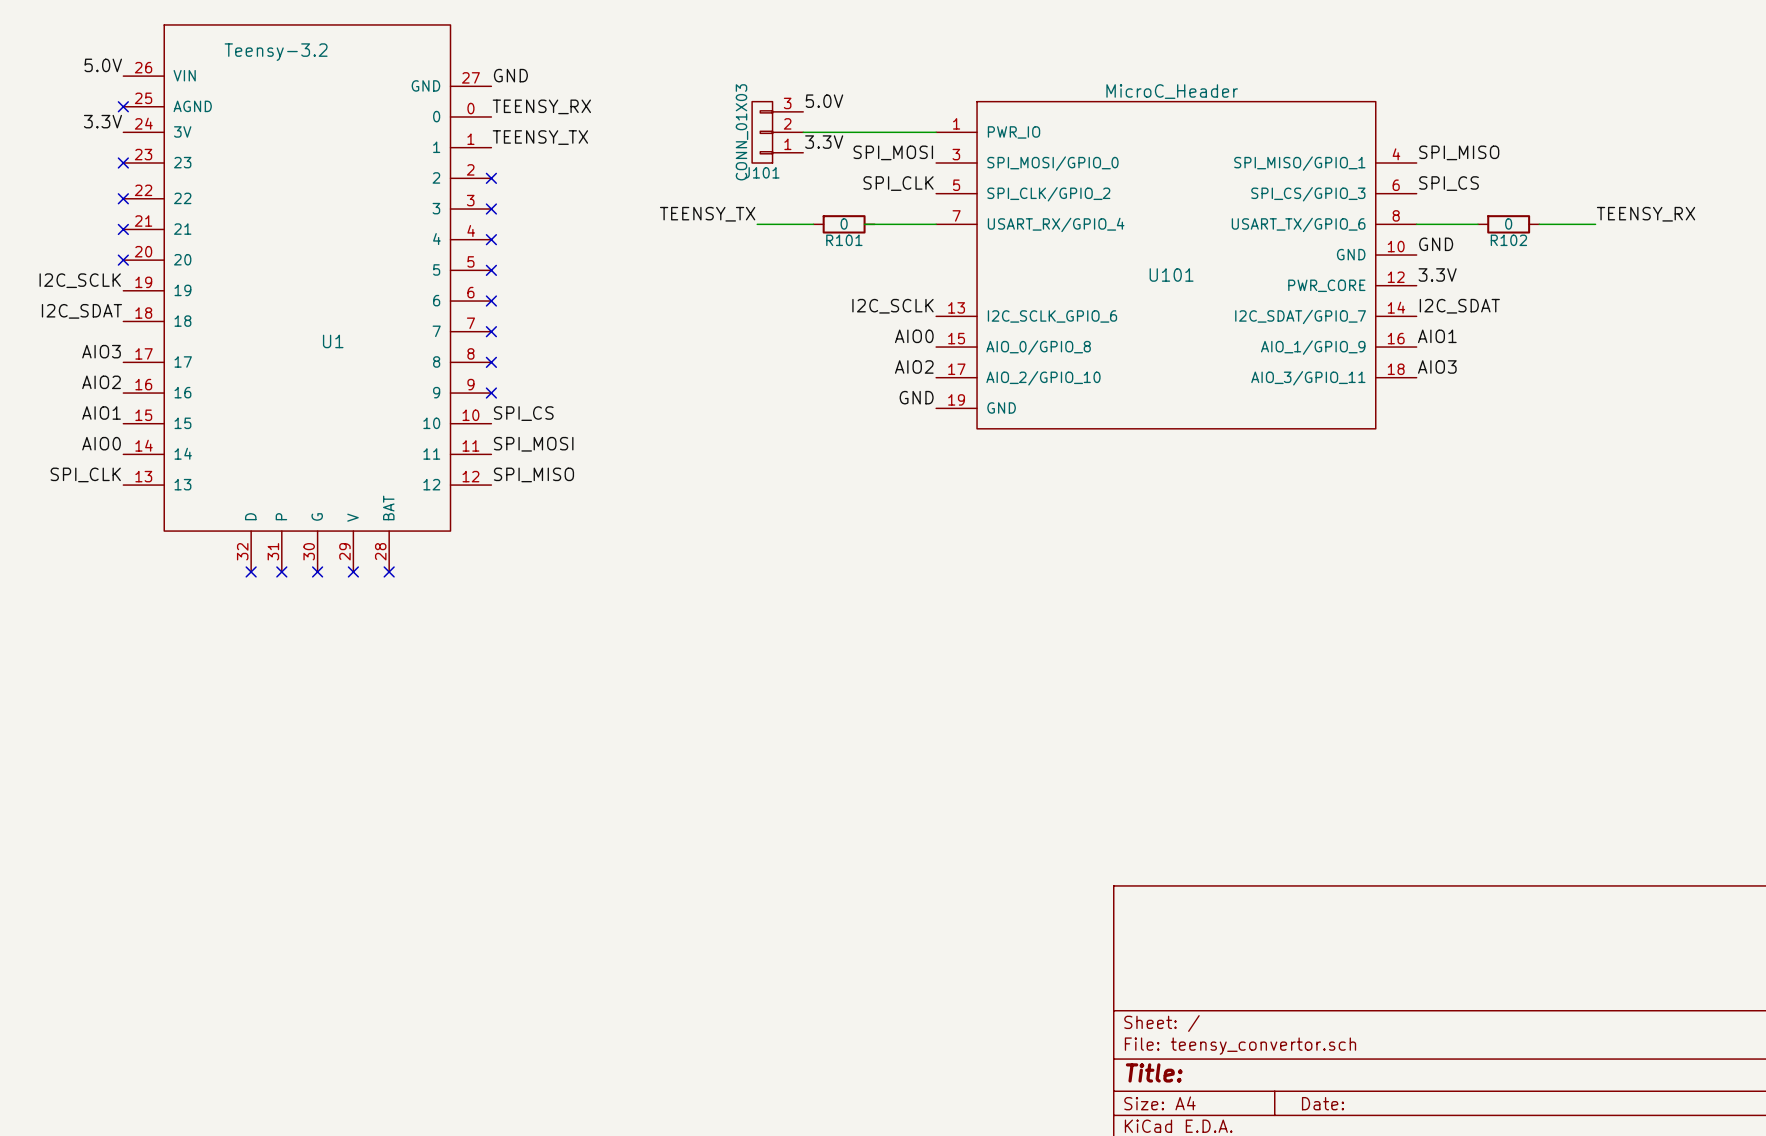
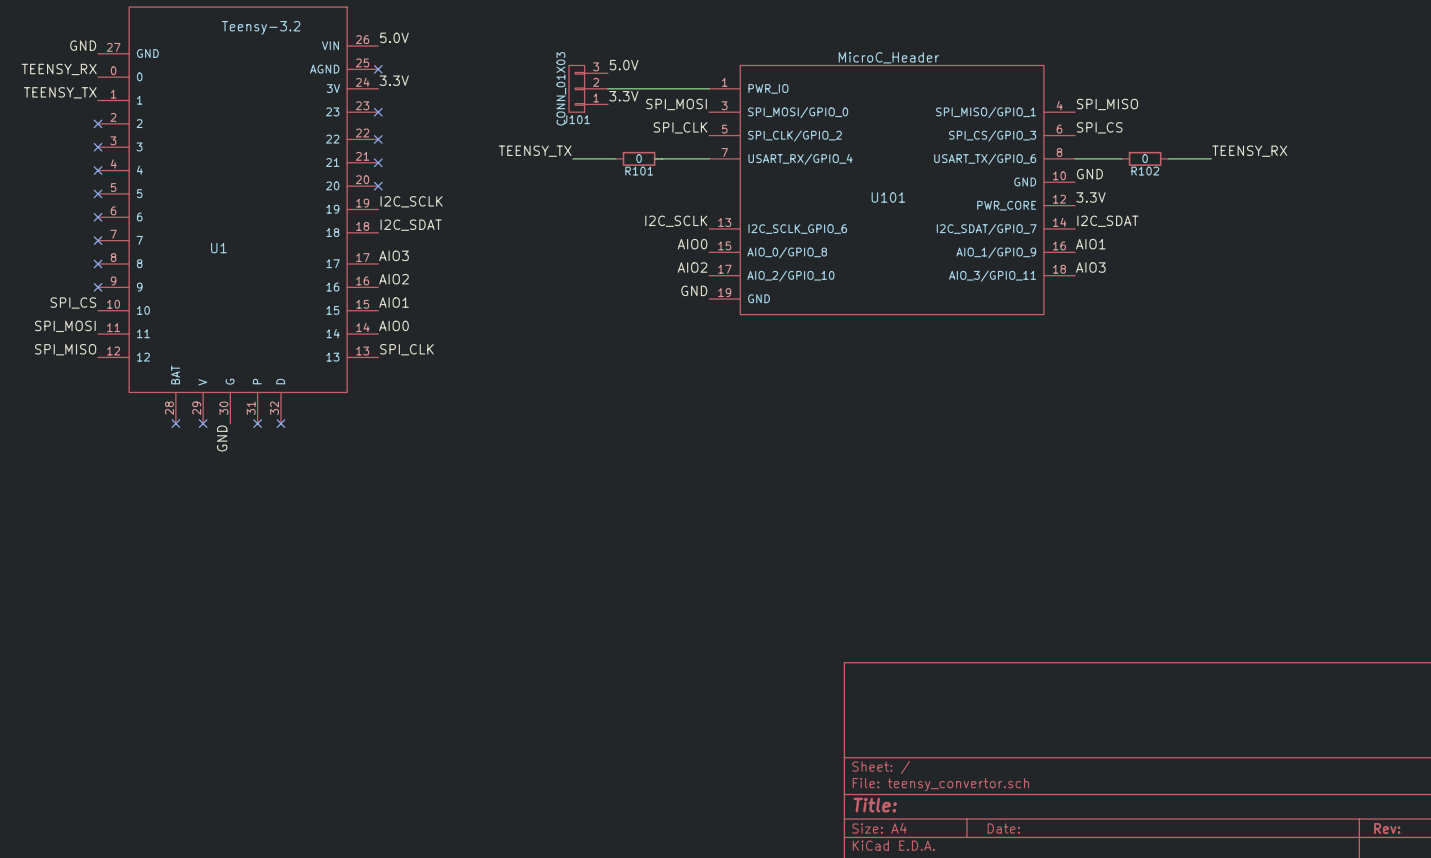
label: 5.0V (103, 65) -> none
label: none -> 5.0V (394, 37)
label: none -> GND (83, 45)
label: GND (510, 75) -> none
label: none -> TEENSY_RX (59, 69)
no-connect mark: (123, 106) -> none
no-connect mark: none -> (378, 69)
label: TEENSY_RX (541, 106) -> none
label: 3.3V (102, 121) -> none
label: none -> 3.3V (394, 80)
label: none -> TEENSY_TX (60, 92)
label: TEENSY_TX (540, 137) -> none
no-connect mark: (123, 163) -> none
no-connect mark: none -> (378, 112)
no-connect mark: none -> (98, 123)
no-connect mark: (491, 178) -> none
no-connect mark: (123, 198) -> none
no-connect mark: none -> (378, 139)
no-connect mark: none -> (98, 147)
no-connect mark: (491, 209) -> none
no-connect mark: (123, 229) -> none
no-connect mark: none -> (378, 162)
no-connect mark: none -> (98, 170)
no-connect mark: (491, 239) -> none
no-connect mark: (123, 260) -> none
no-connect mark: none -> (378, 186)
no-connect mark: none -> (98, 193)
no-connect mark: (491, 270) -> none
U1 flip: as is (307, 278) -> left-right (238, 199)
label: I2C_SCLK (80, 280) -> none
label: none -> I2C_SCLK (411, 201)
no-connect mark: none -> (98, 217)
no-connect mark: (491, 301) -> none
label: I2C_SDAT (81, 311) -> none
label: none -> I2C_SDAT (411, 225)
no-connect mark: none -> (98, 240)
no-connect mark: (491, 331) -> none
label: AIO3 (101, 351) -> none
label: none -> AIO3 (394, 255)
no-connect mark: none -> (98, 264)
no-connect mark: (491, 362) -> none
label: AIO2 (101, 382) -> none
label: none -> AIO2 (394, 279)
no-connect mark: none -> (98, 287)
no-connect mark: (491, 393) -> none
label: AIO1 (101, 413) -> none
label: none -> SPI_CS (73, 303)
label: none -> AIO1 (394, 302)
label: SPI_CS (523, 413) -> none
label: AIO0 (101, 443) -> none
label: none -> AIO0 (394, 325)
label: none -> SPI_MOSI (65, 326)
label: SPI_MOSI (533, 444) -> none
label: SPI_CLK (85, 474) -> none
label: none -> SPI_MISO (65, 349)
label: SPI_MISO (533, 474) -> none
label: none -> SPI_CLK (406, 349)
no-connect mark: none -> (175, 423)
no-connect mark: (251, 571) -> none
no-connect mark: none -> (203, 423)
no-connect mark: (281, 571) -> none
no-connect mark: (317, 571) -> none
no-connect mark: none -> (257, 423)
no-connect mark: (353, 571) -> none
no-connect mark: none -> (280, 423)
no-connect mark: (389, 571) -> none
label: none -> GND (222, 438)

